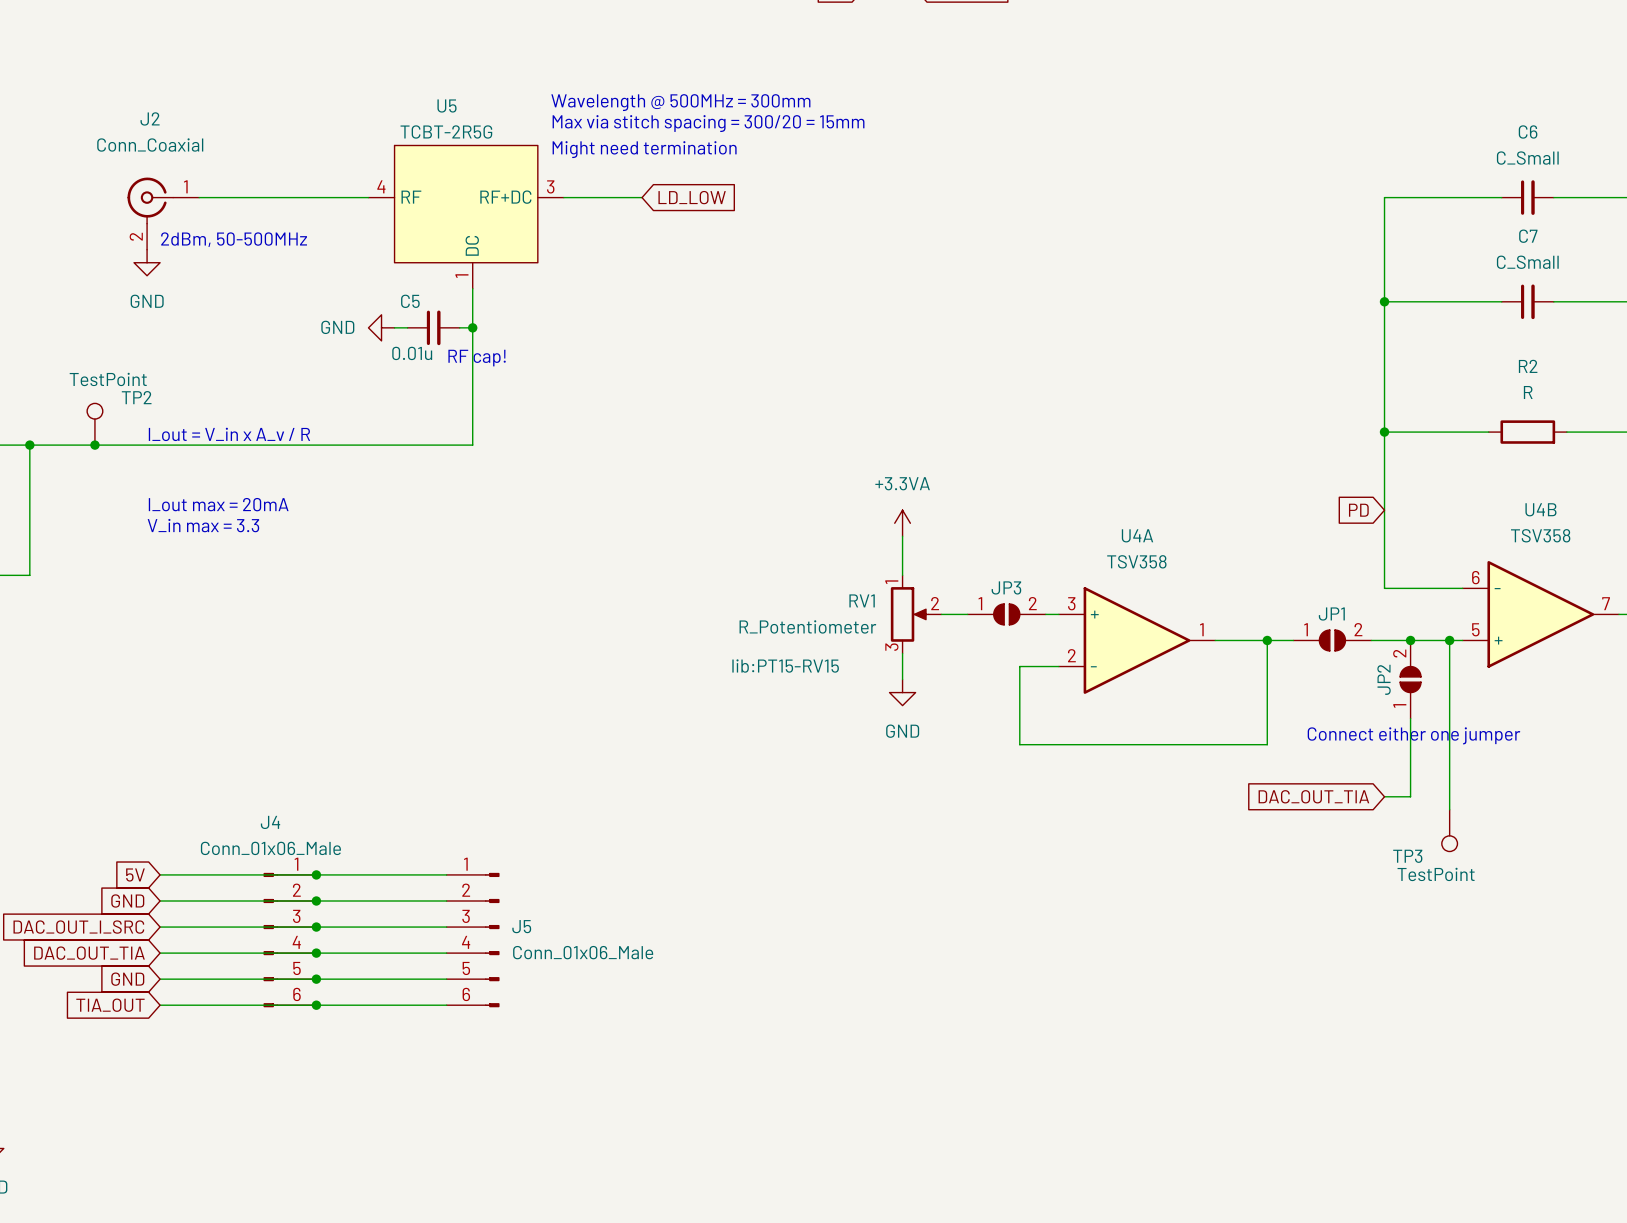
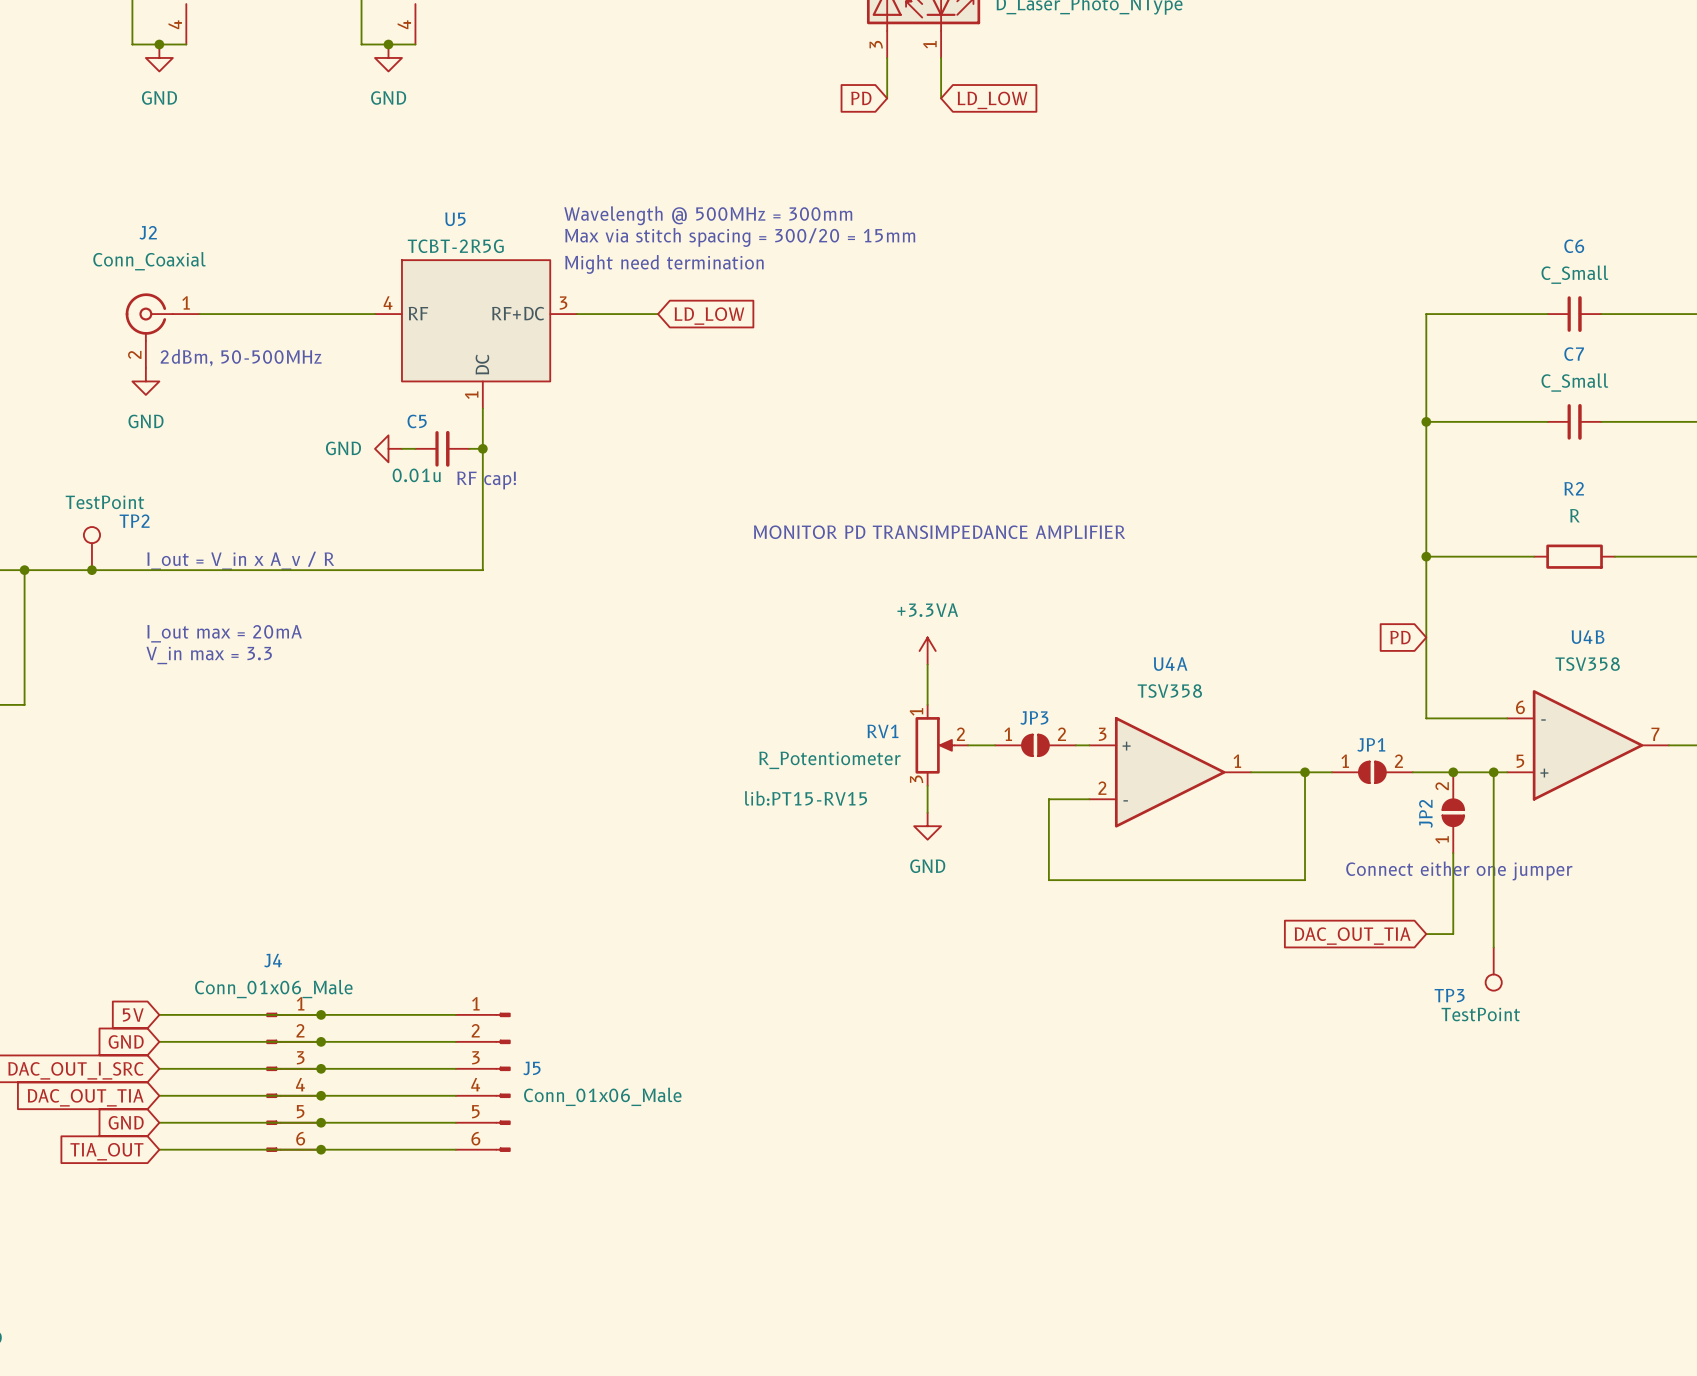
text: none -> MONITOR PD TRANSIMPEDANCE AMPLIFIER (939, 532)

